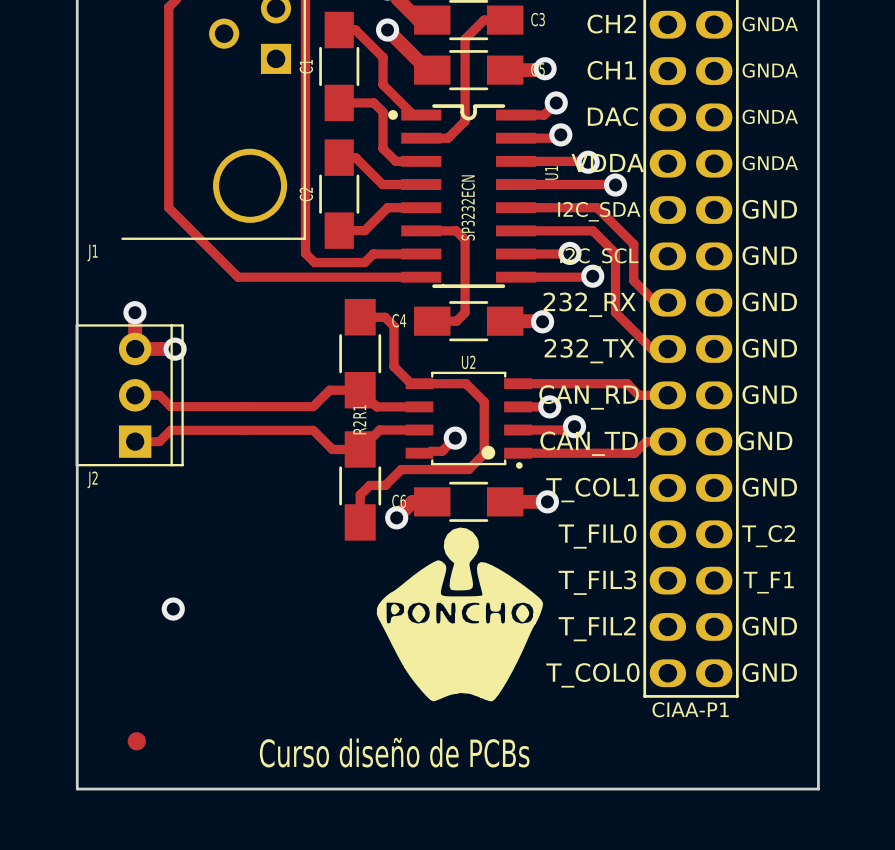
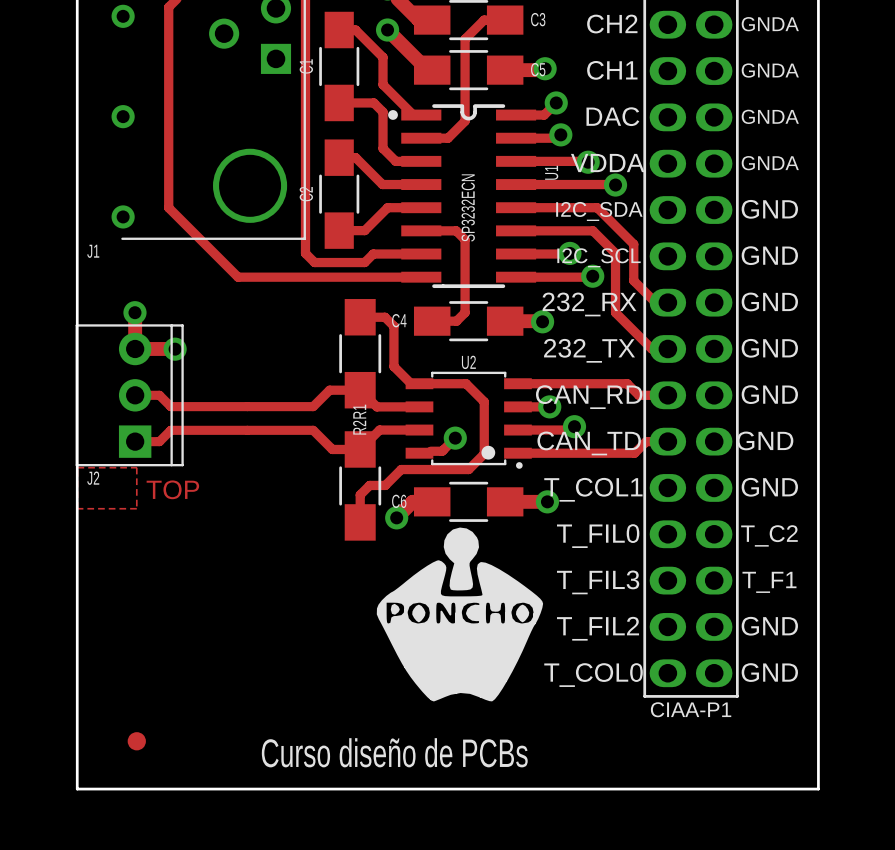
via: none -> (123, 16)
via: none -> (123, 116)
via: none -> (123, 216)
zone outline: none -> (77, 467) (136, 467) (136, 508) (77, 508) (77, 467)
text: none -> TOP (172, 489)
via: (173, 609) -> none

